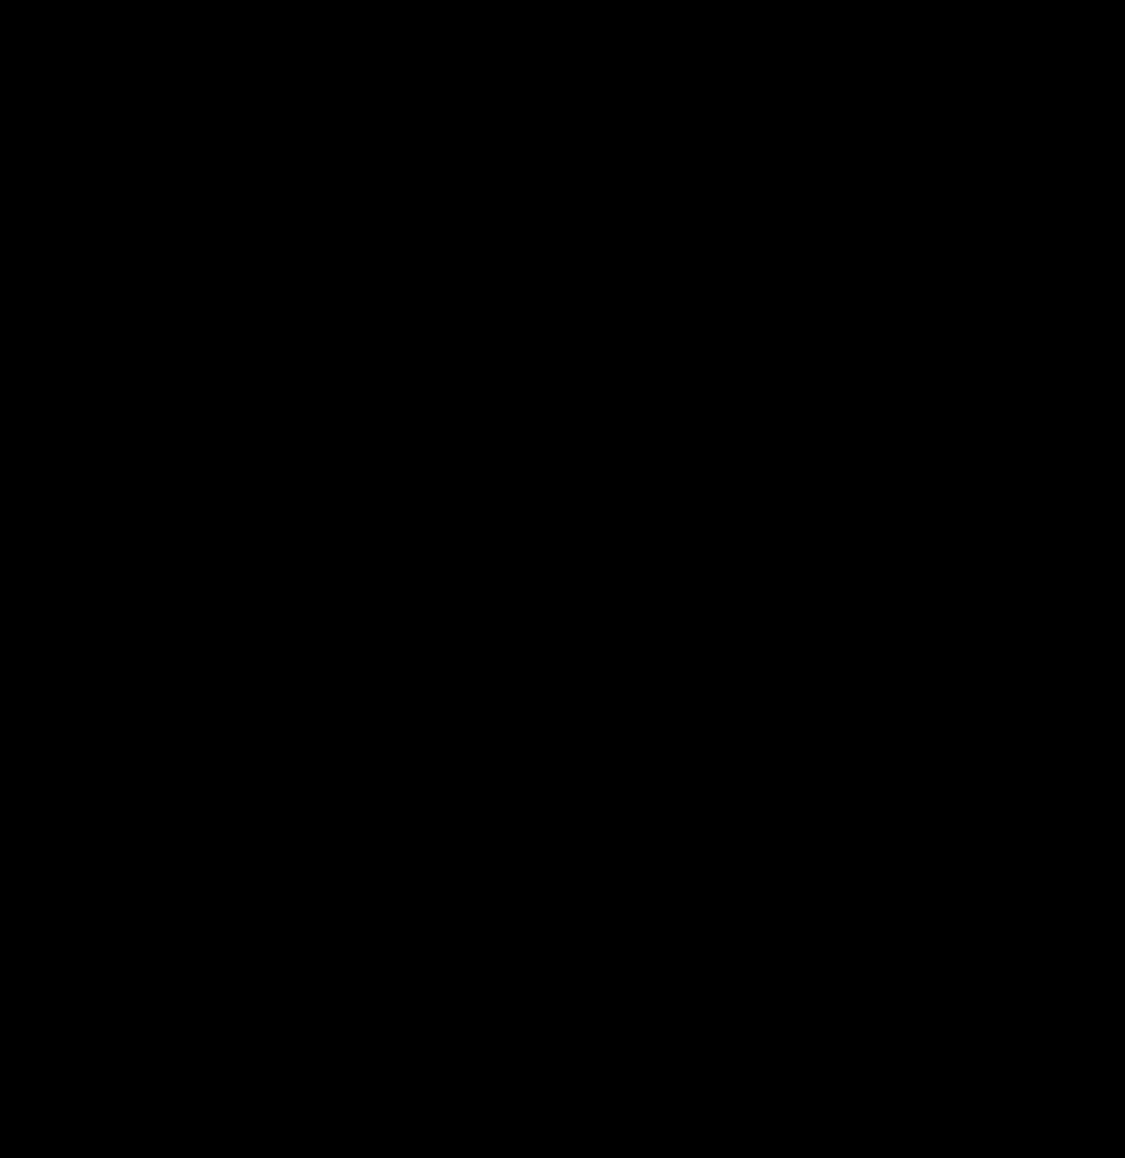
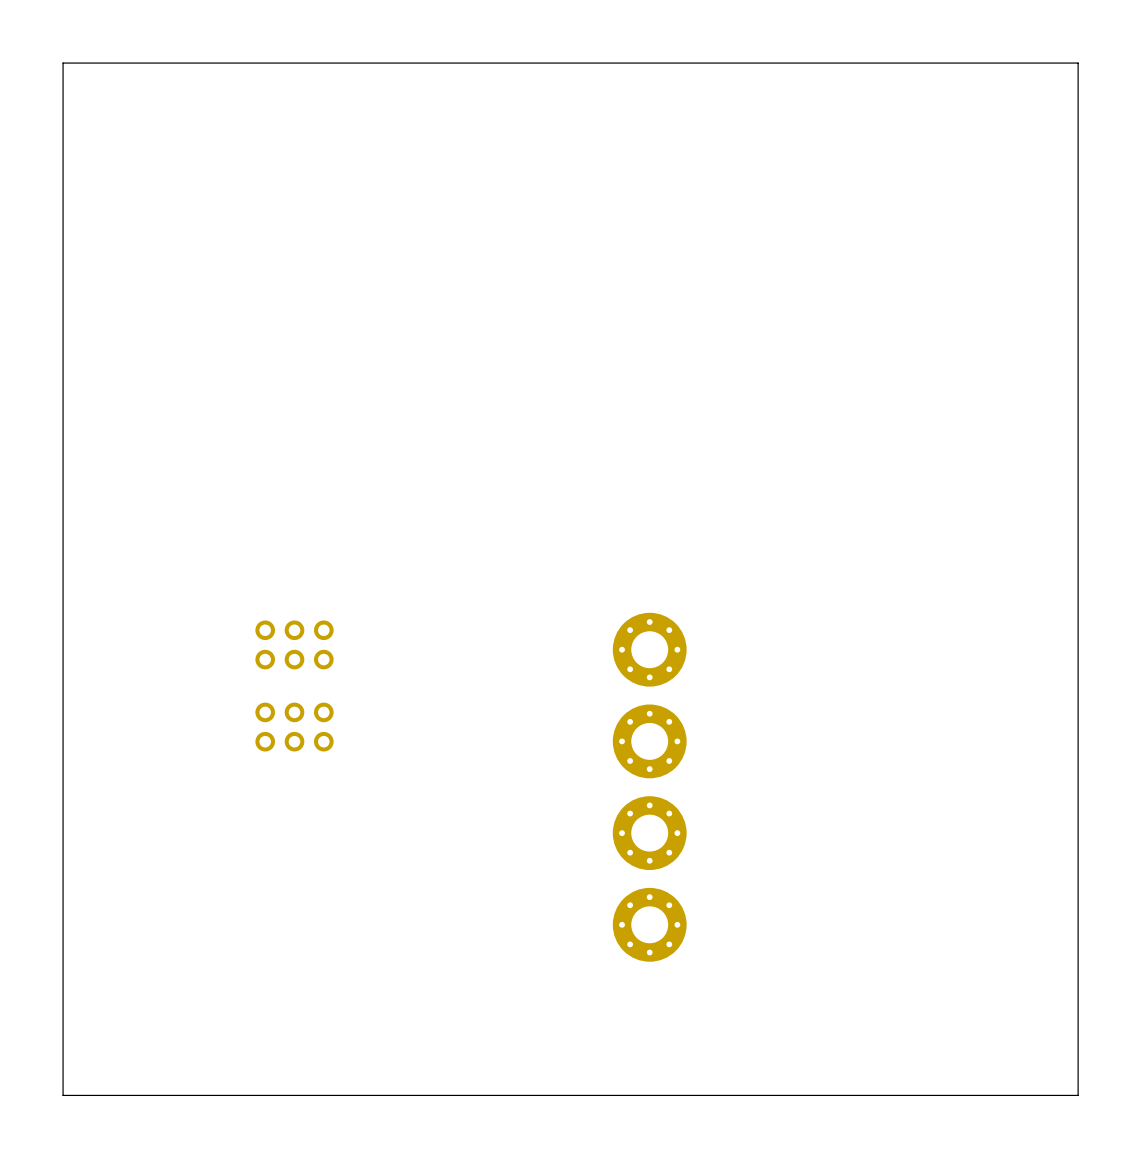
board edge: none -> (1078, 63) (63, 63) (63, 1095) (1078, 1095) (1078, 63)
part: none -> (294, 644)
part: none -> (649, 649)
part: none -> (294, 727)
part: none -> (649, 741)
part: none -> (649, 833)
part: none -> (649, 924)

